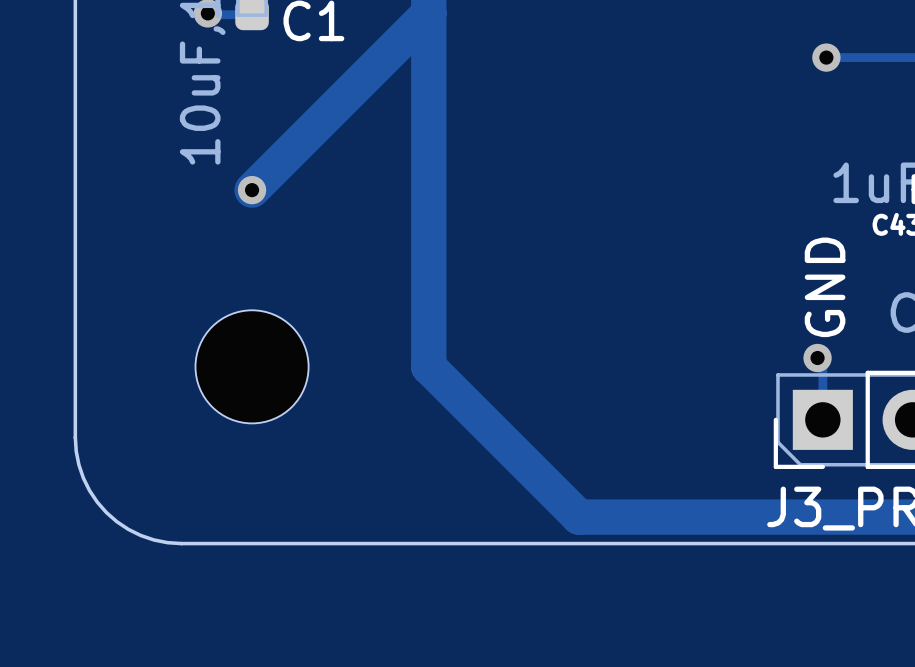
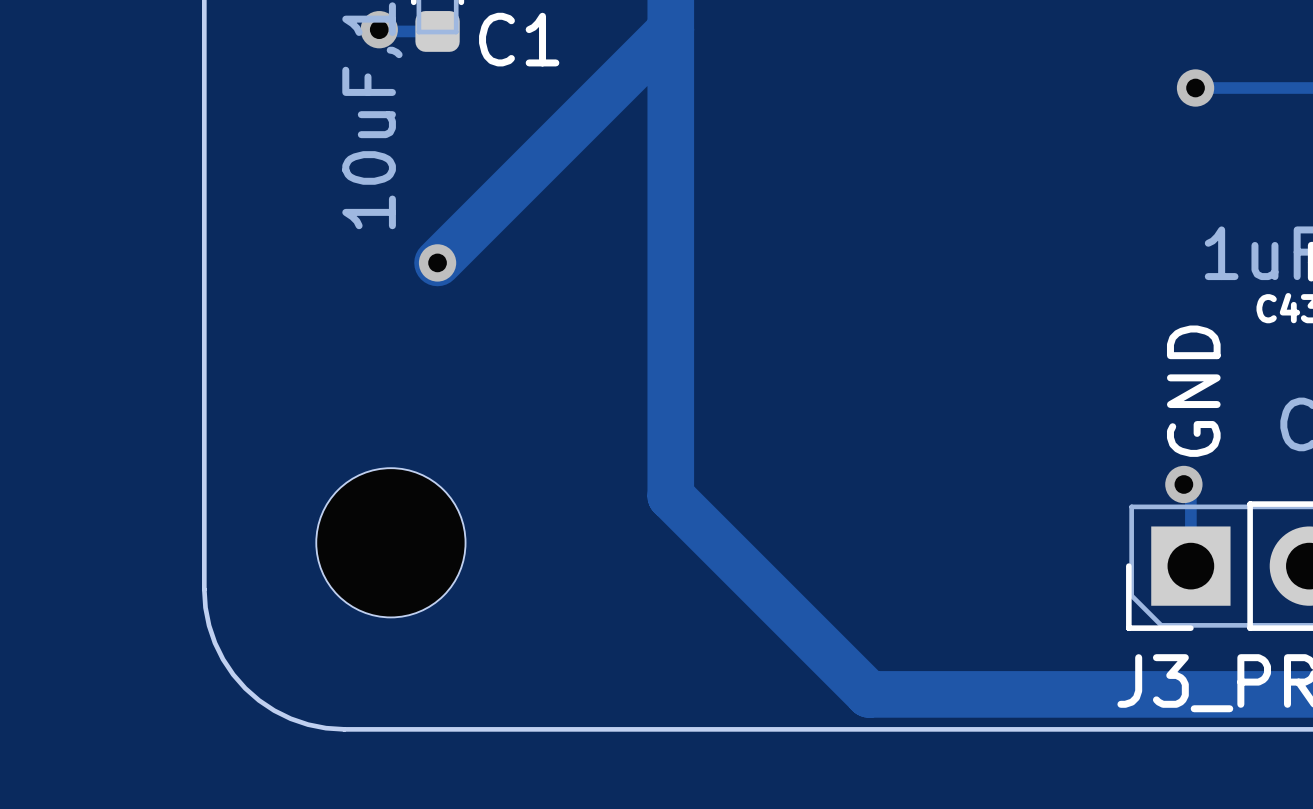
part position: (252, 366) -> (390, 542)

